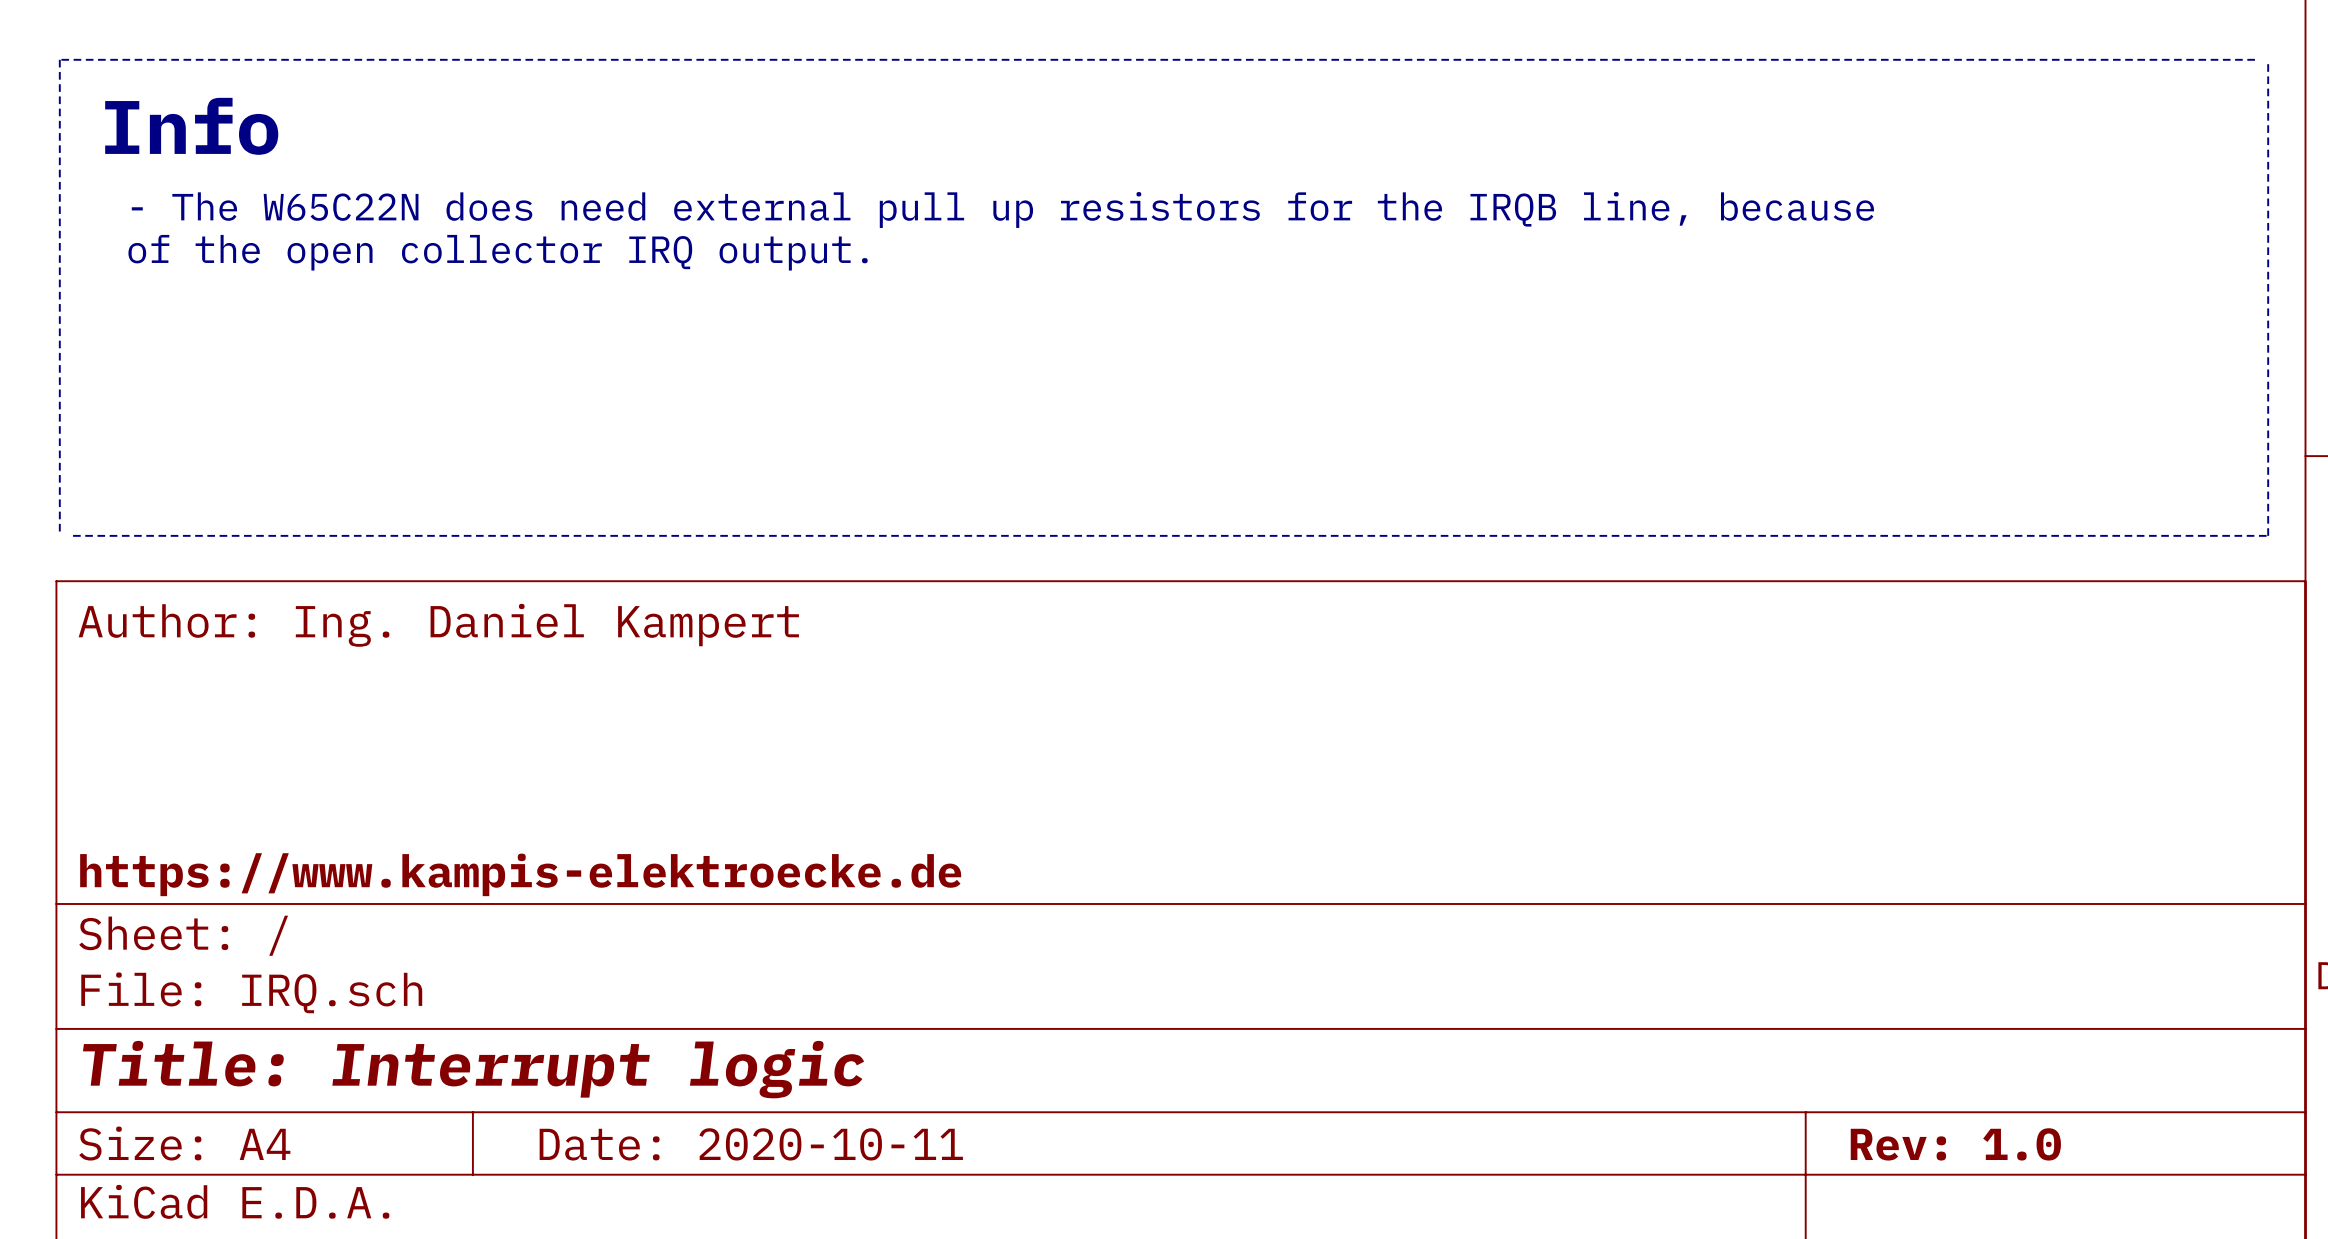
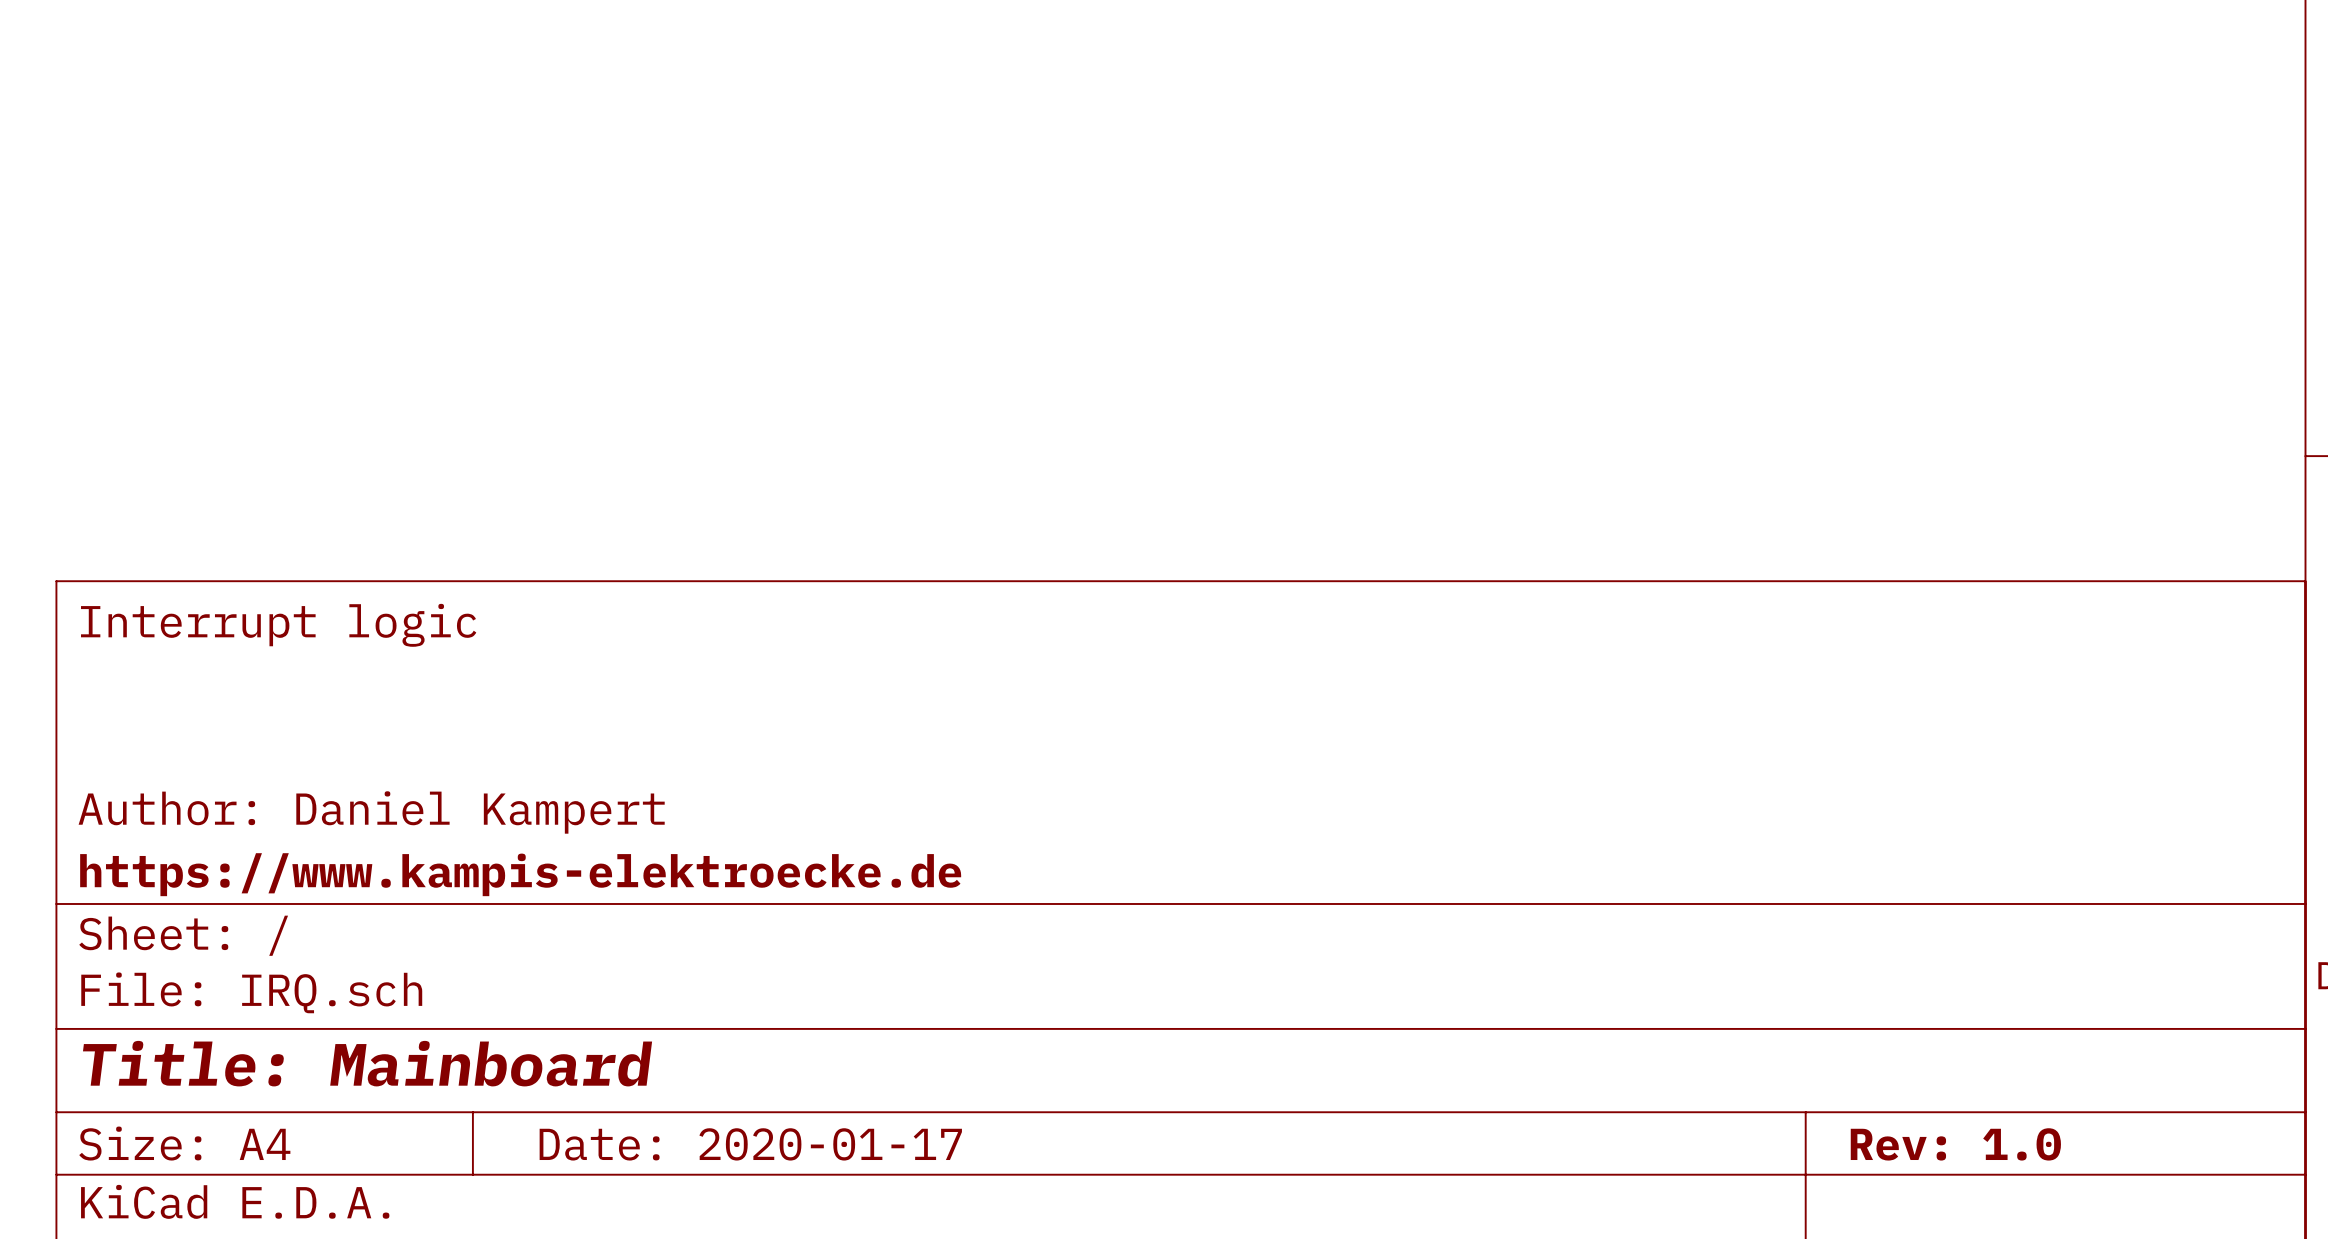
line: (2254, 59) (59, 59) (59, 535) -> none
line: (2268, 59) (2268, 535) (73, 535) -> none
text: Info (191, 126) -> none
text: - The W65C22N does need external pull up resistors for the IRQB line, because (1002, 209) -> none
text: of the open collector IRQ output. (498, 252) -> none
title block: Author: Ing. Daniel Kampert (438, 625) -> Interrupt logic (278, 625)
title block: none -> Author: Daniel Kampert (371, 812)
title block: Title: Interrupt logic (473, 1069) -> Title: Mainboard (367, 1063)
title block: Date: 2020-10-11 (751, 1144) -> Date: 2020-01-17 (750, 1144)

